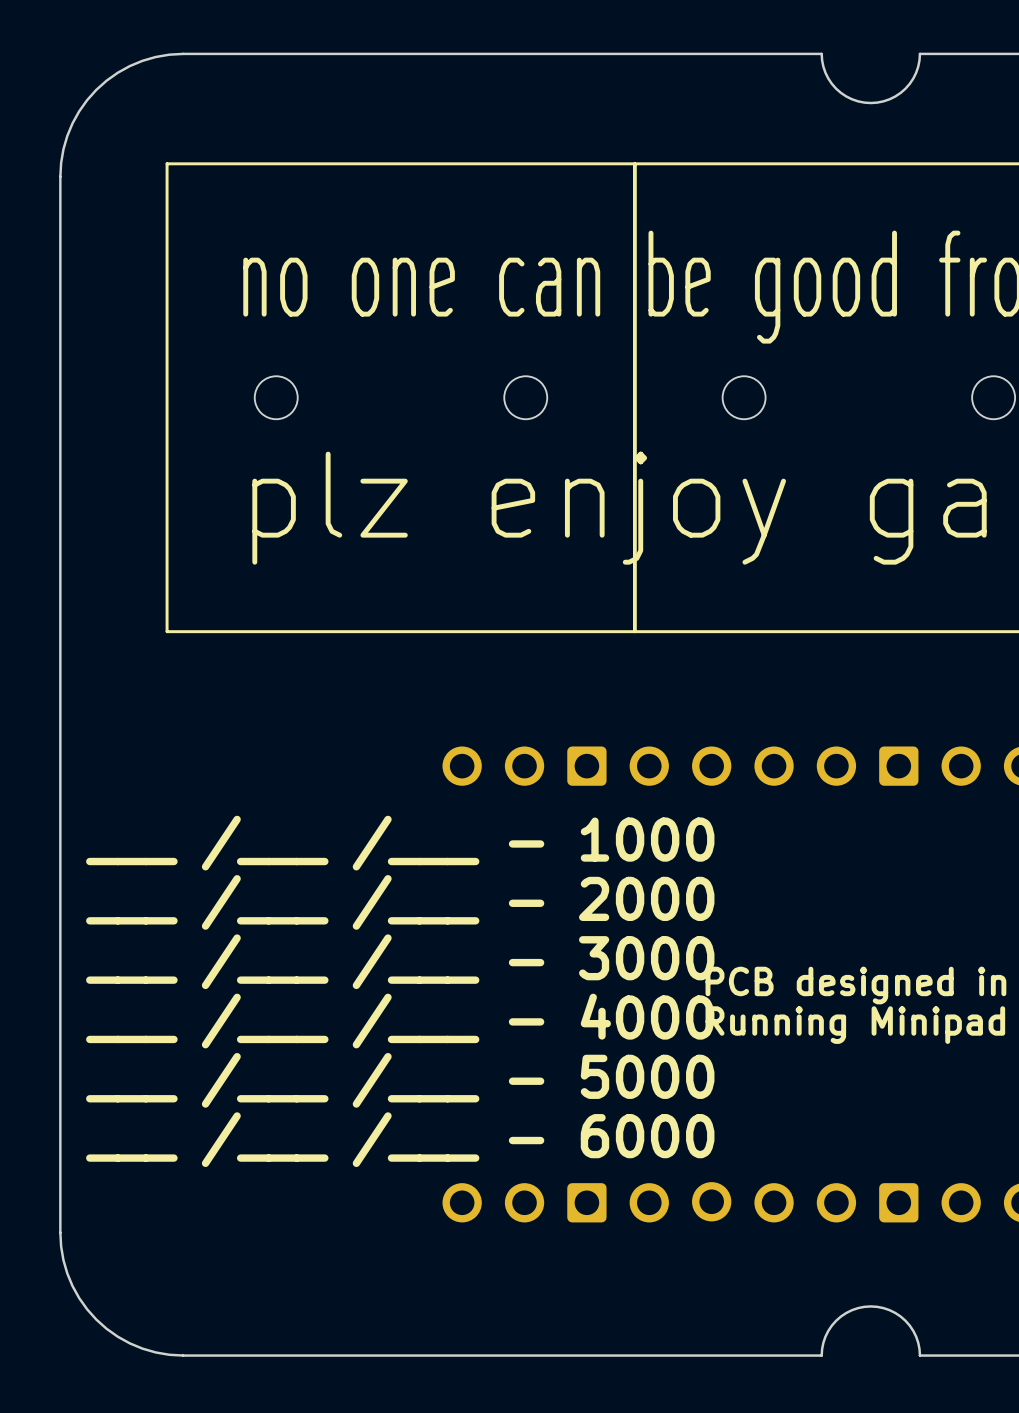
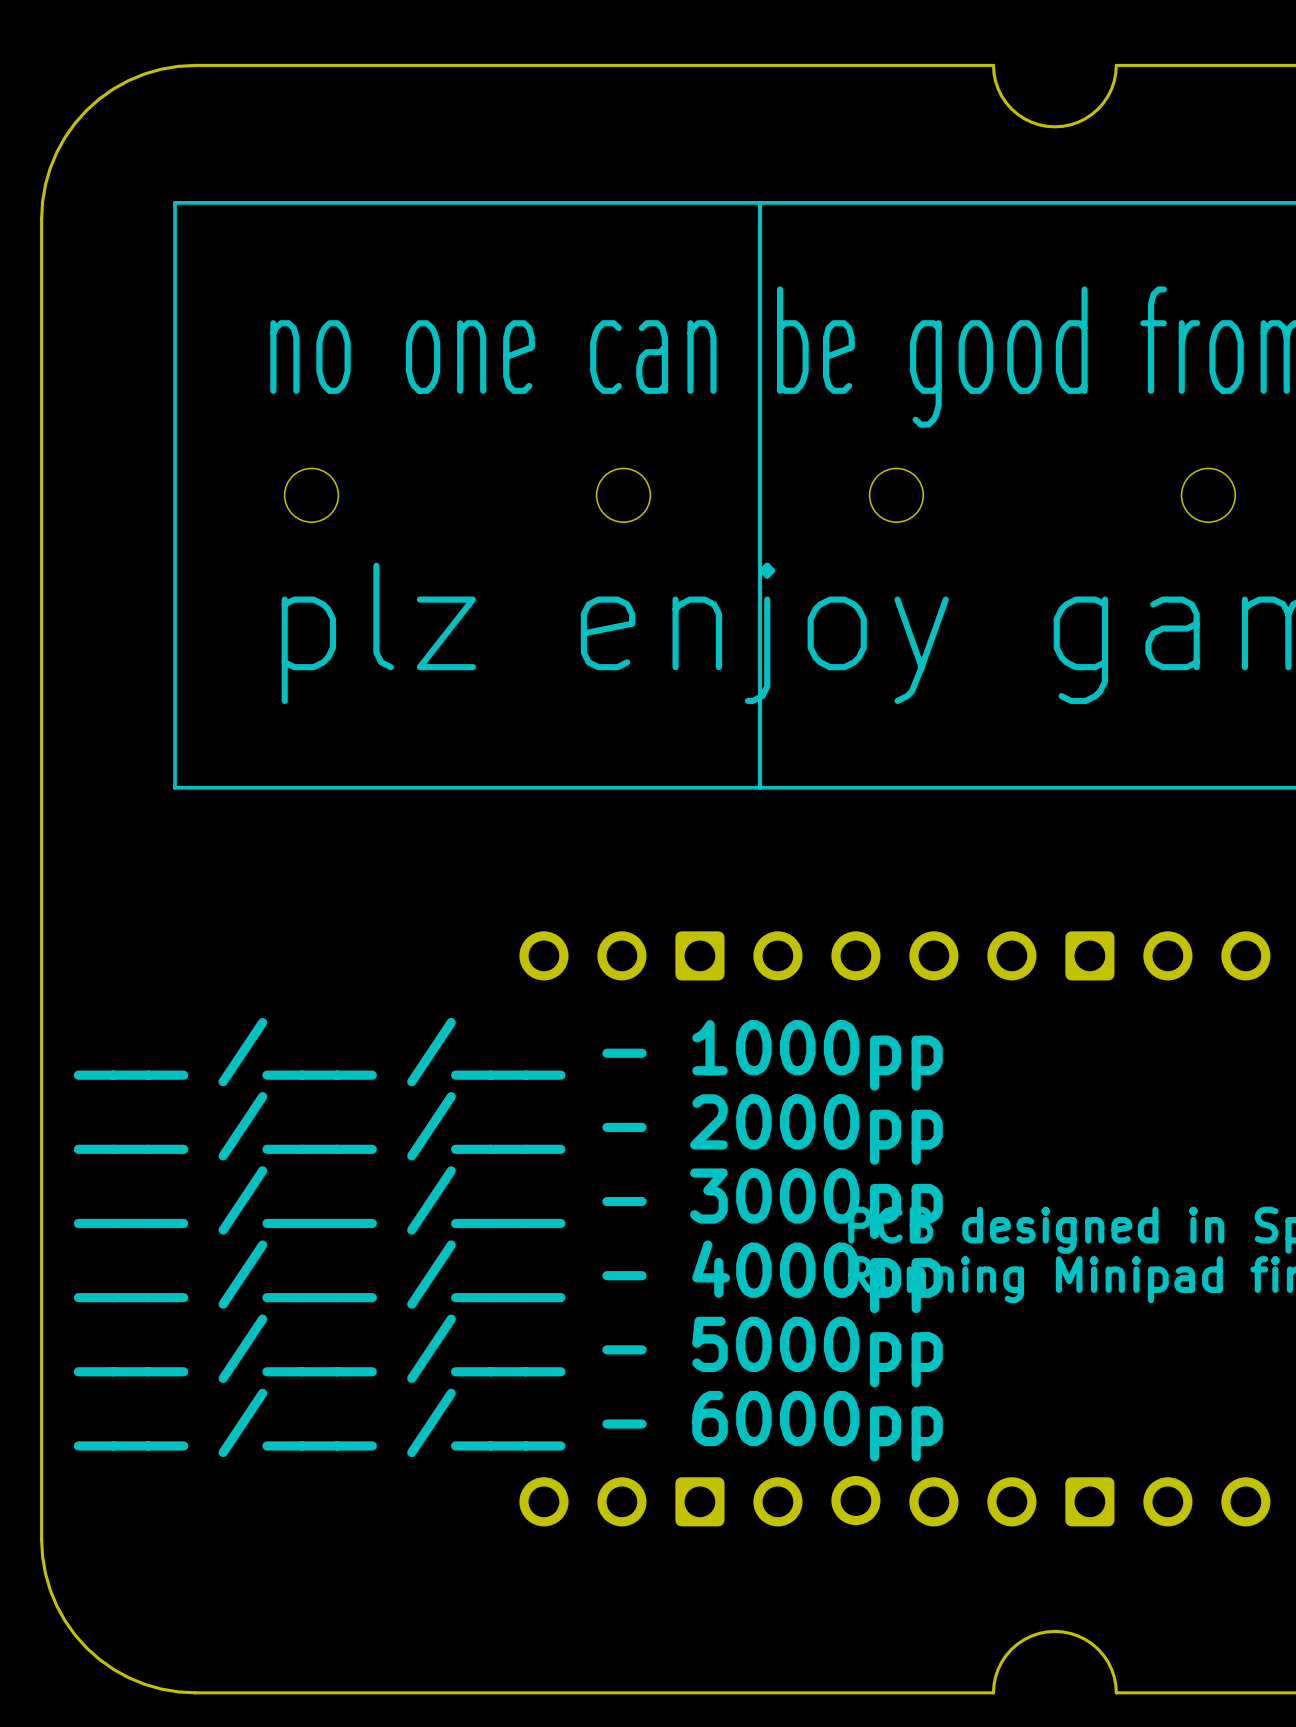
text: ___ /___ /___ - 1000 (400, 843) -> ___ /___ /___ - 1000pp (508, 1054)
text: ___ /___ /___ - 2000 (400, 902) -> ___ /___ /___ - 2000pp (508, 1128)
text: ___ /___ /___ - 3000 (400, 961) -> ___ /___ /___ - 3000pp (508, 1202)
text: ___ /___ /___ - 4000 (400, 1021) -> ___ /___ /___ - 4000pp (508, 1276)
text: ___ /___ /___ - 5000 (400, 1080) -> ___ /___ /___ - 5000pp (508, 1350)
text: ___ /___ /___ - 6000 (400, 1139) -> ___ /___ /___ - 6000pp (508, 1425)

